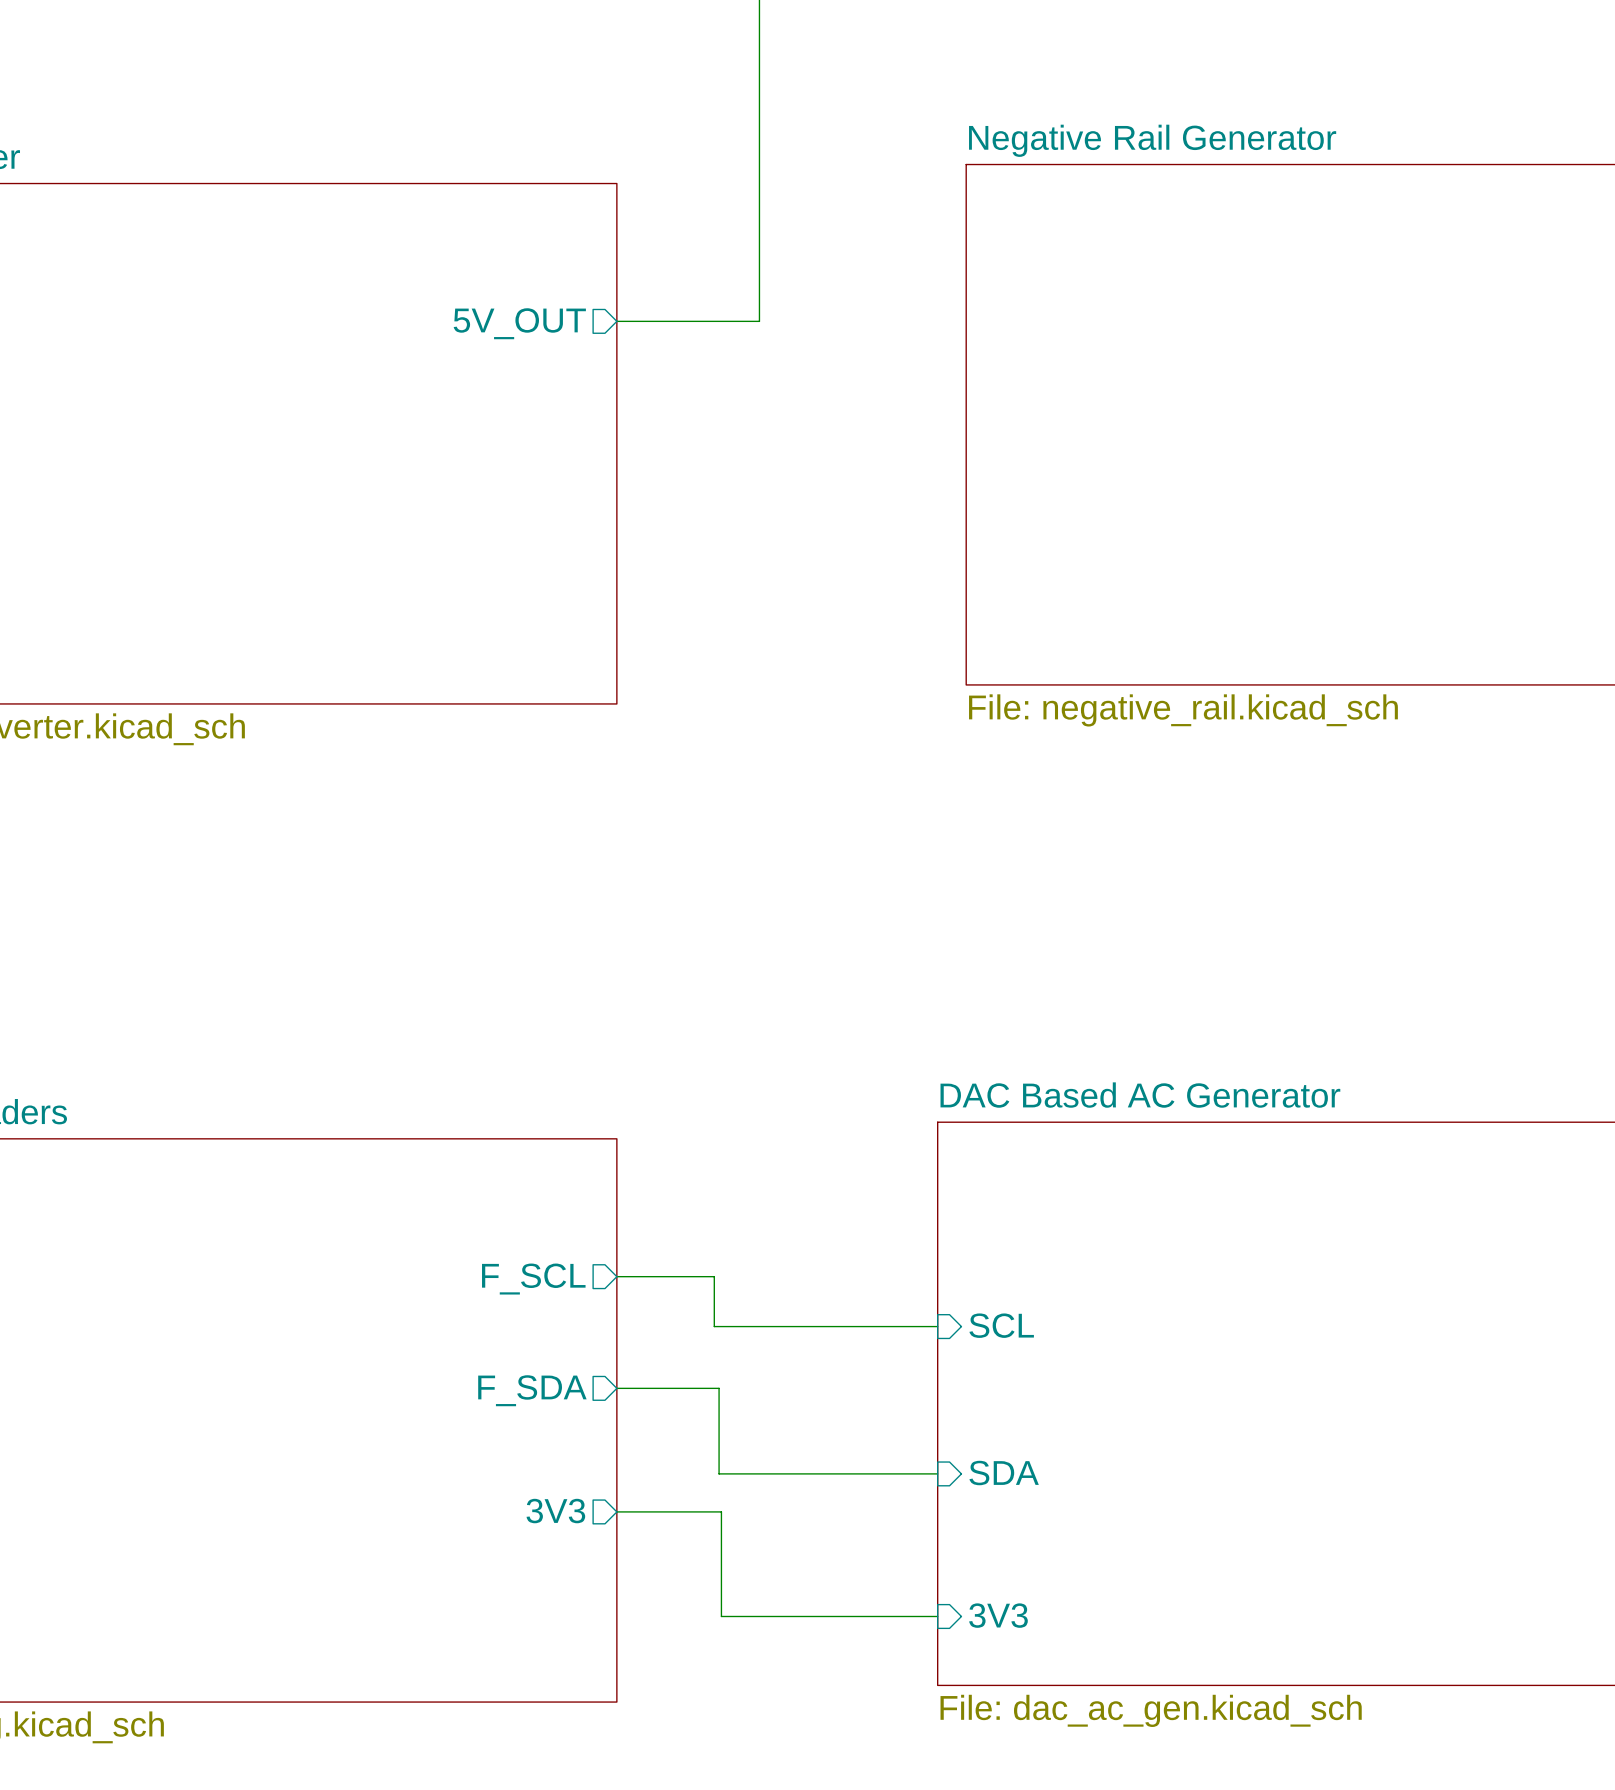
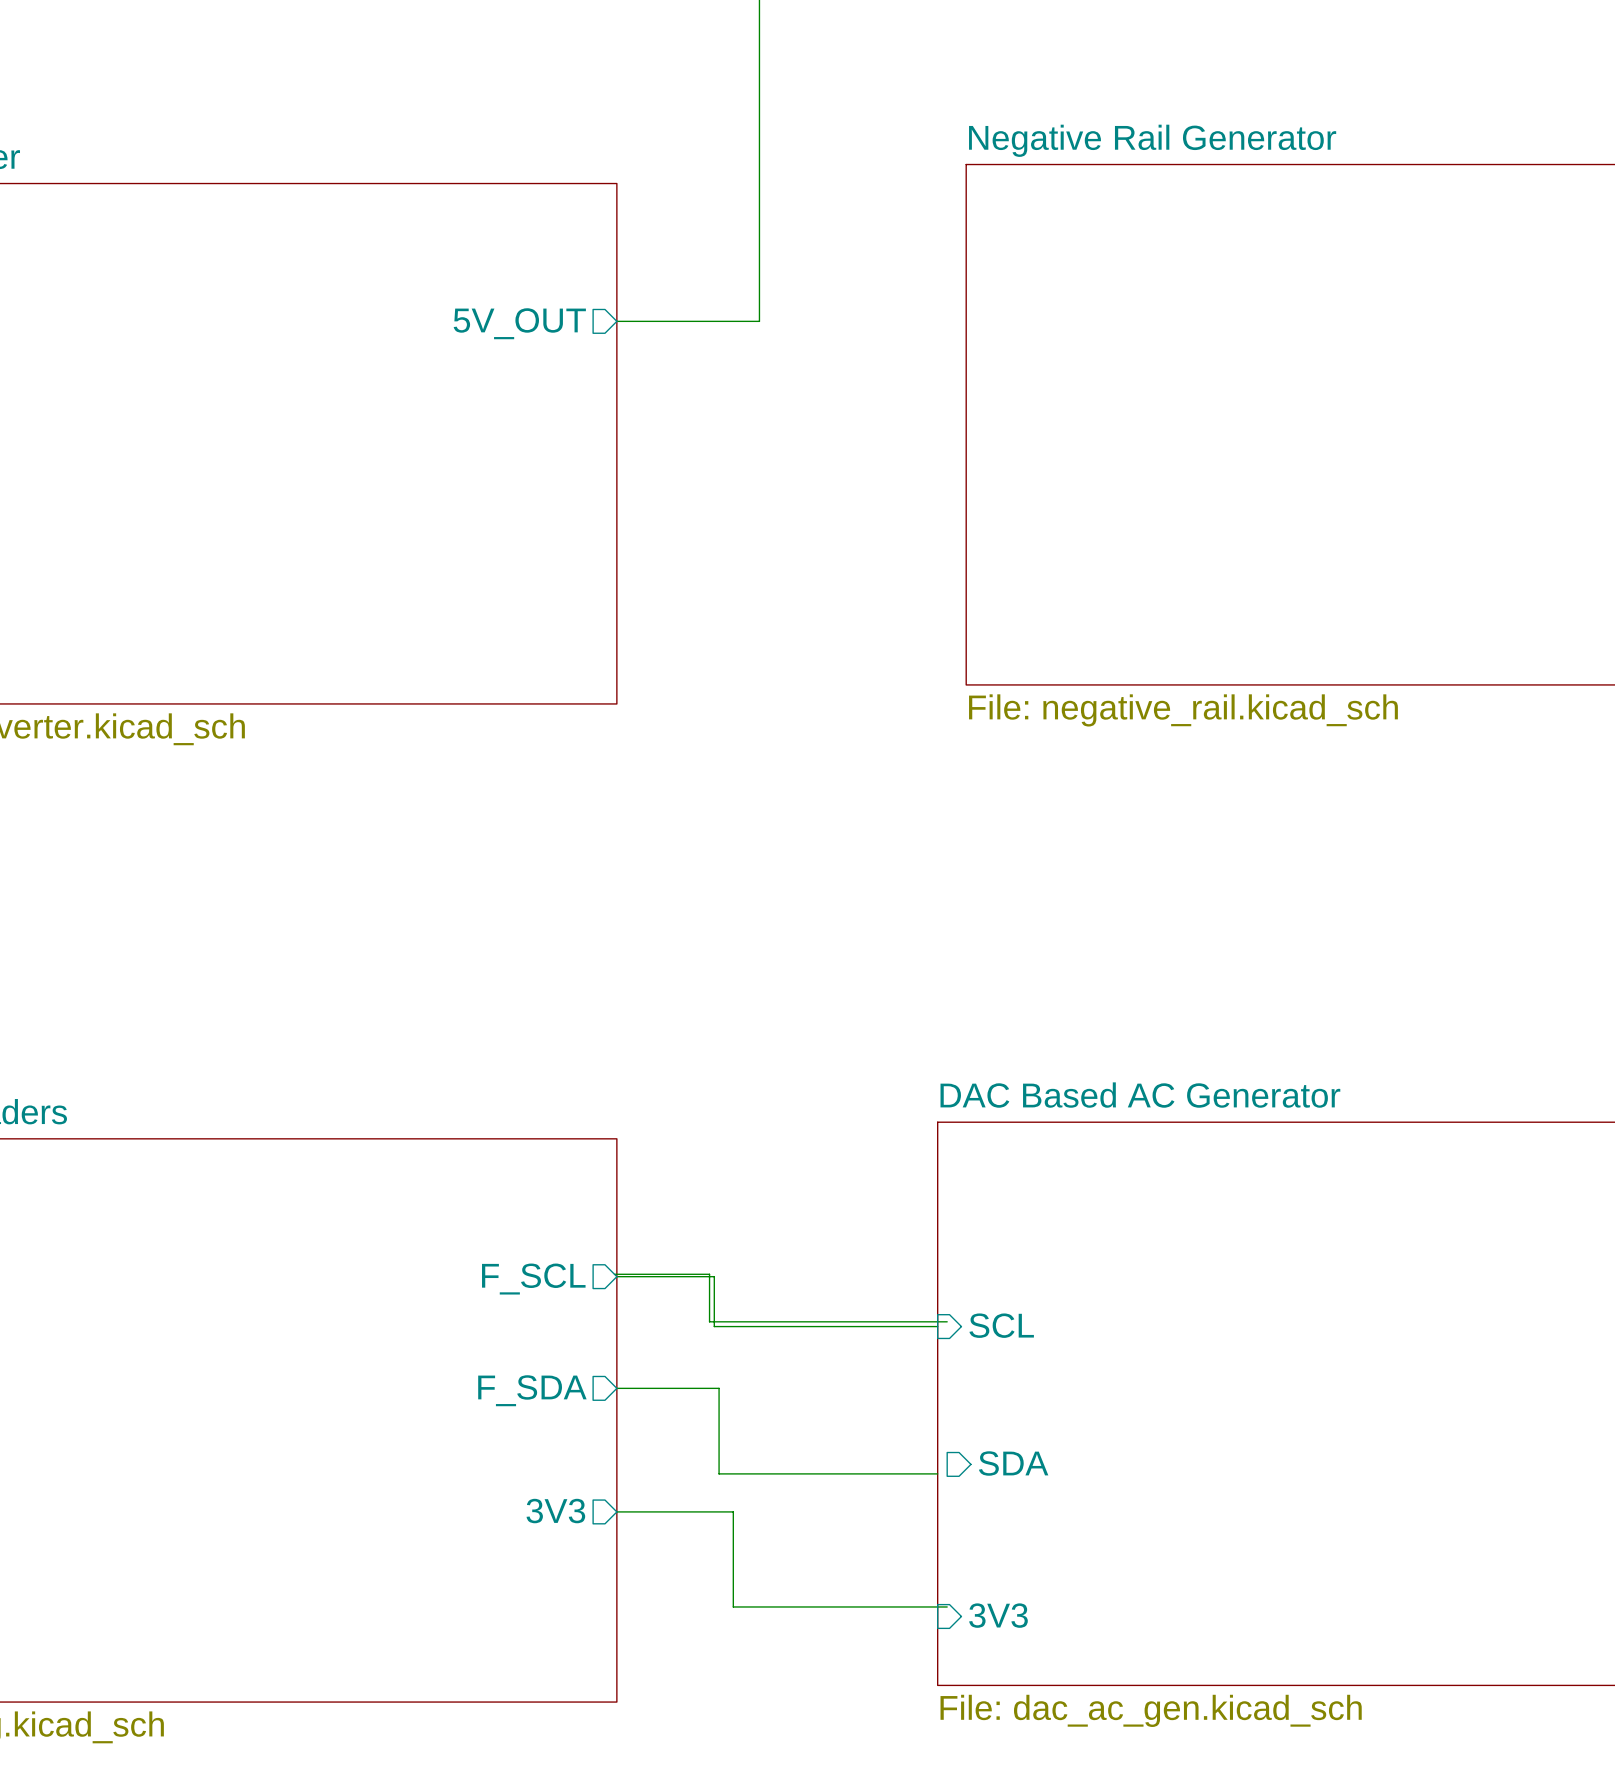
wire: none -> (614, 1274) (709, 1274) (709, 1321) (947, 1321)
sheet pin position: SDA (1004, 1473) -> SDA (1013, 1463)
wire: (721, 1511) (721, 1616) (937, 1616) -> (721, 1511) (733, 1511) (733, 1606) (947, 1606)

